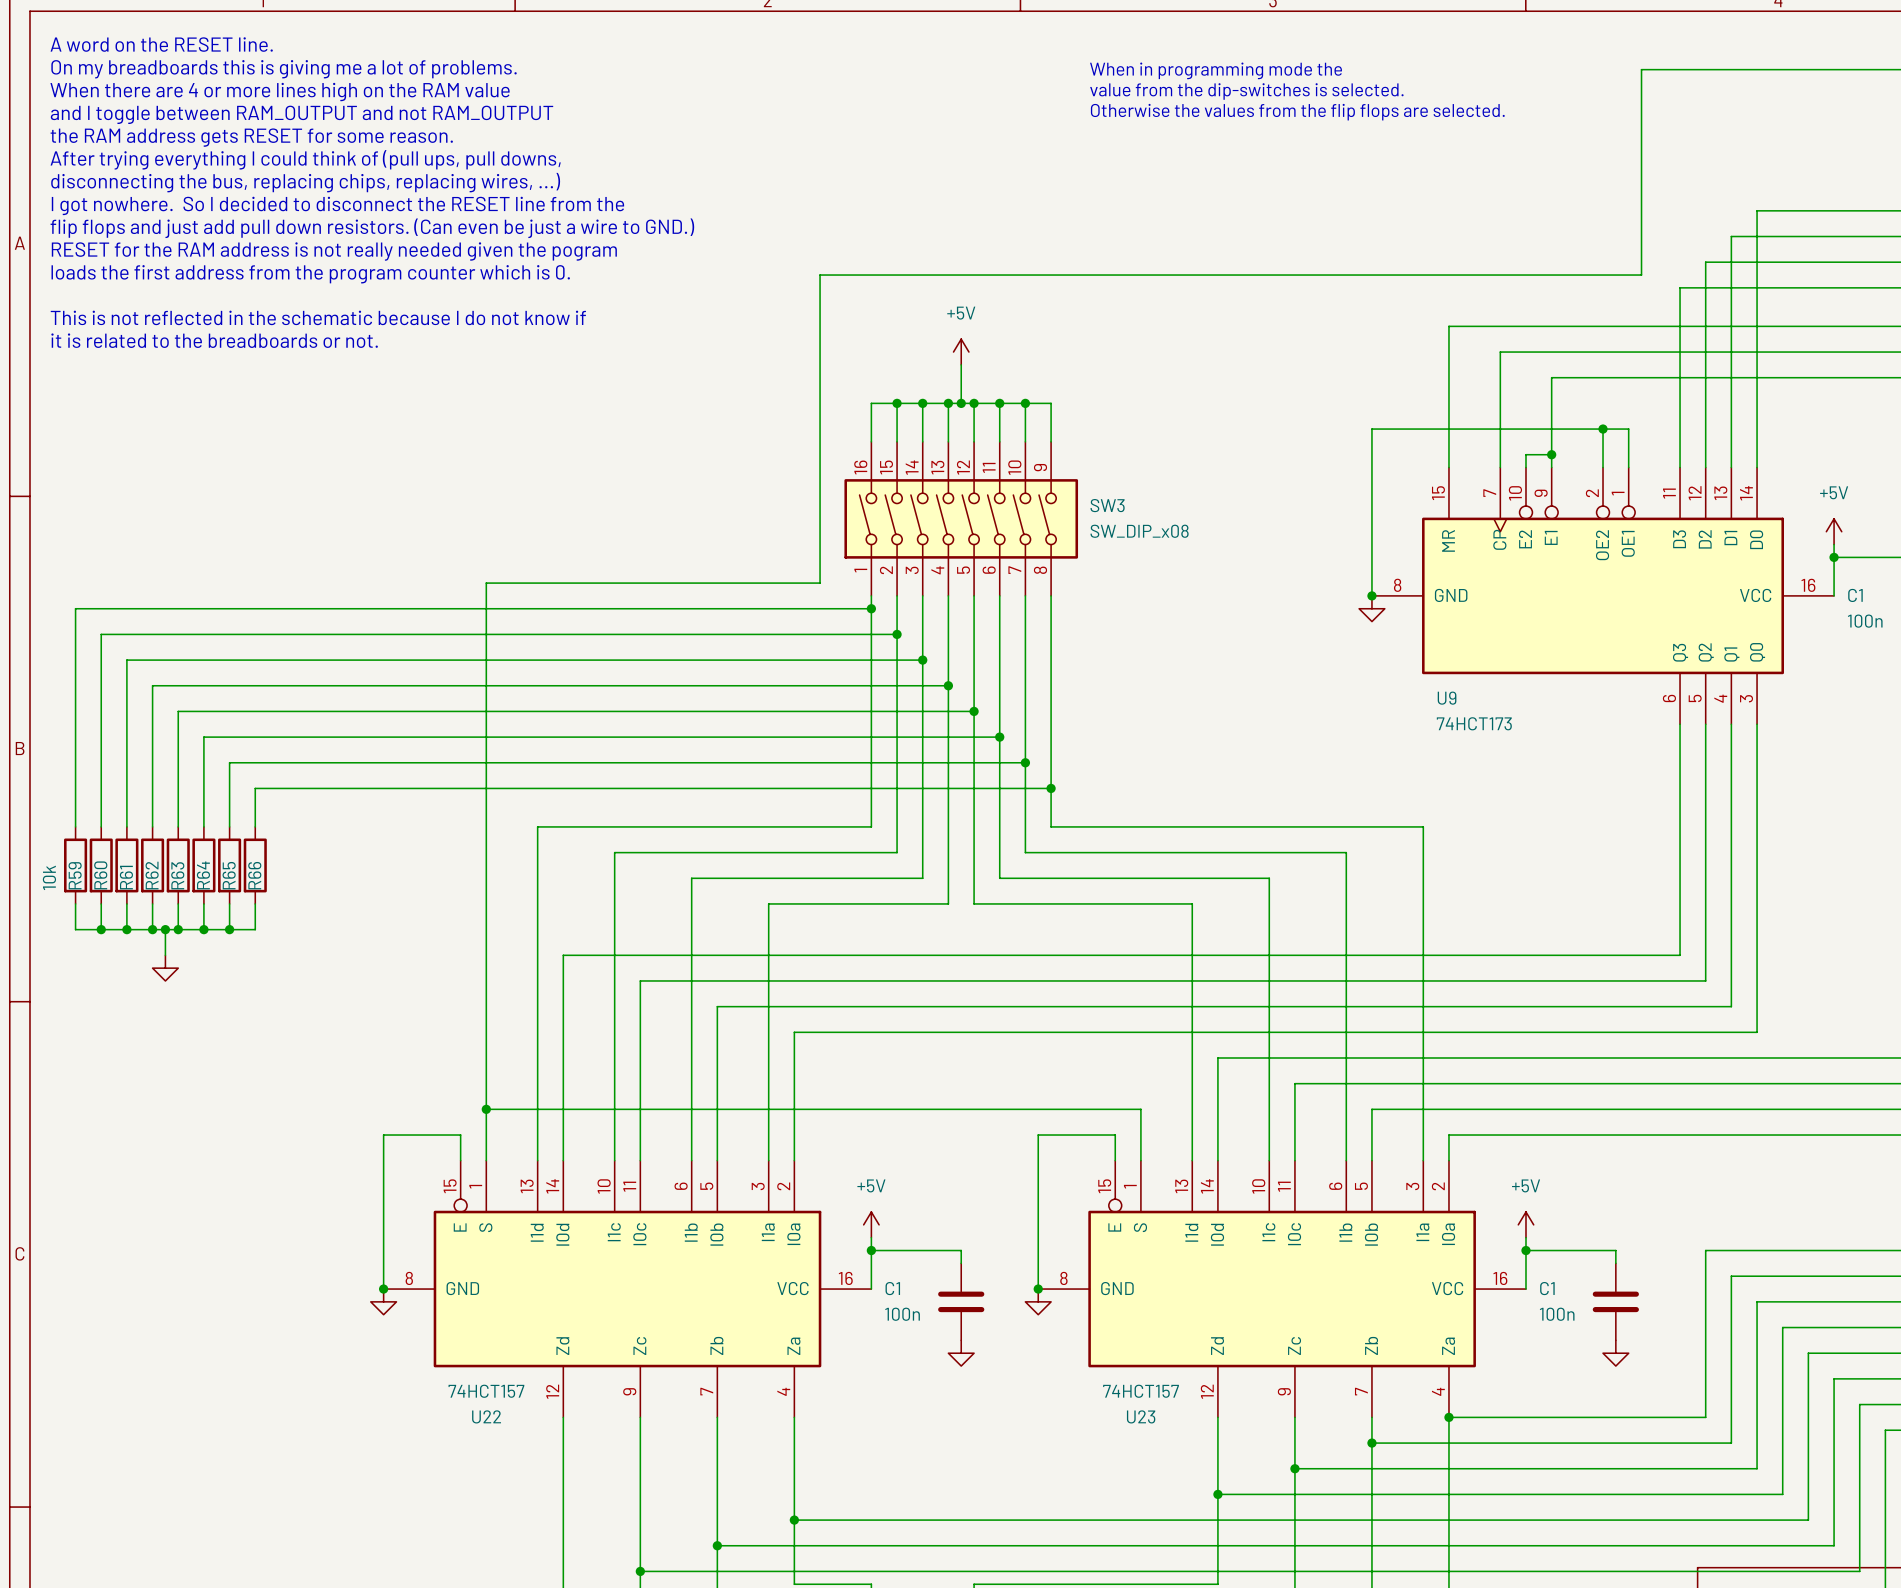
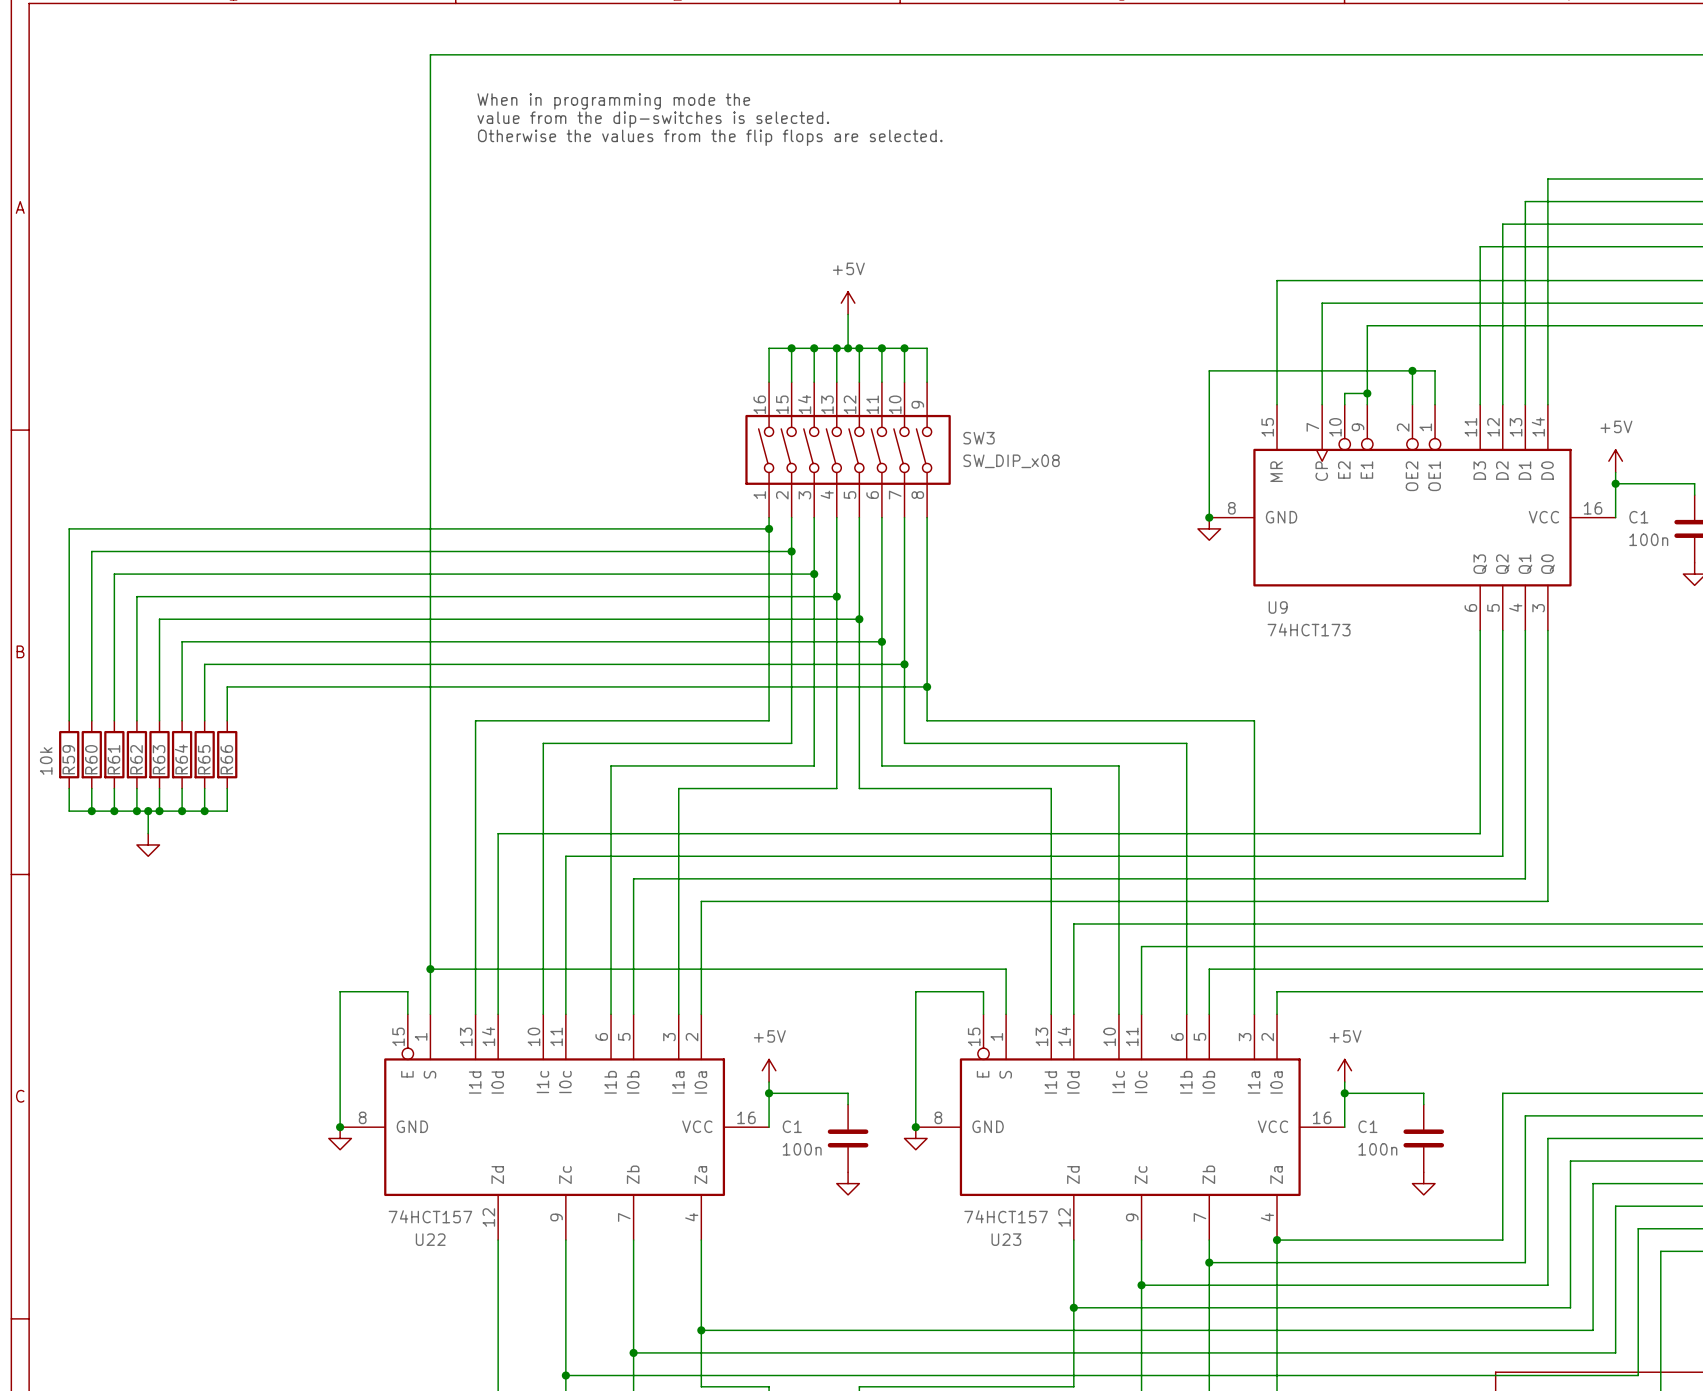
text: A word on the RESET line. (161, 44) -> none
text: On my breadboards this is giving me a lot of problems. (284, 69) -> none
wire: (1641, 69) (1641, 275) (820, 275) (820, 583) (486, 583) -> (1446, 54) (430, 54) (430, 506)
text: When in programming mode the (1216, 70) -> none
text: value from the dip-switches is selected. (1246, 91) -> none
text: When there are 4 or more lines high on the RAM value (280, 92) -> none
text: Otherwise the values from the flip flops are selected. (1297, 112) -> none
text: and I toggle between RAM_OUTPUT and not RAM_OUTPUT (302, 114) -> none
text: none -> When in programming mode the (613, 101)
text: the RAM address gets RESET for some reason. (251, 137) -> none
text: none -> value from the dip-switches is selected. (653, 119)
text: After trying everything I could think of (pull ups, pull downs, (305, 159) -> none
text: none -> Otherwise the values from the flip flops are selected. (710, 137)
text: disconnecting the bus, replacing chips, replacing wires, ...) (305, 182) -> none
text: I got nowhere. So I decided to disconnect the RESET line from the (337, 205) -> none
text: flip flops and just add pull down resistors. (Can even be just a wire to GND.) (372, 228) -> none
text: RESET for the RAM address is not really needed given the pogram (334, 251) -> none
text: loads the first address from the program counter which is 0. (310, 274) -> none
text: This is not reflected in the schematic because I do not know if (318, 317) -> none
text: it is related to the breadboards or not. (214, 340) -> none

